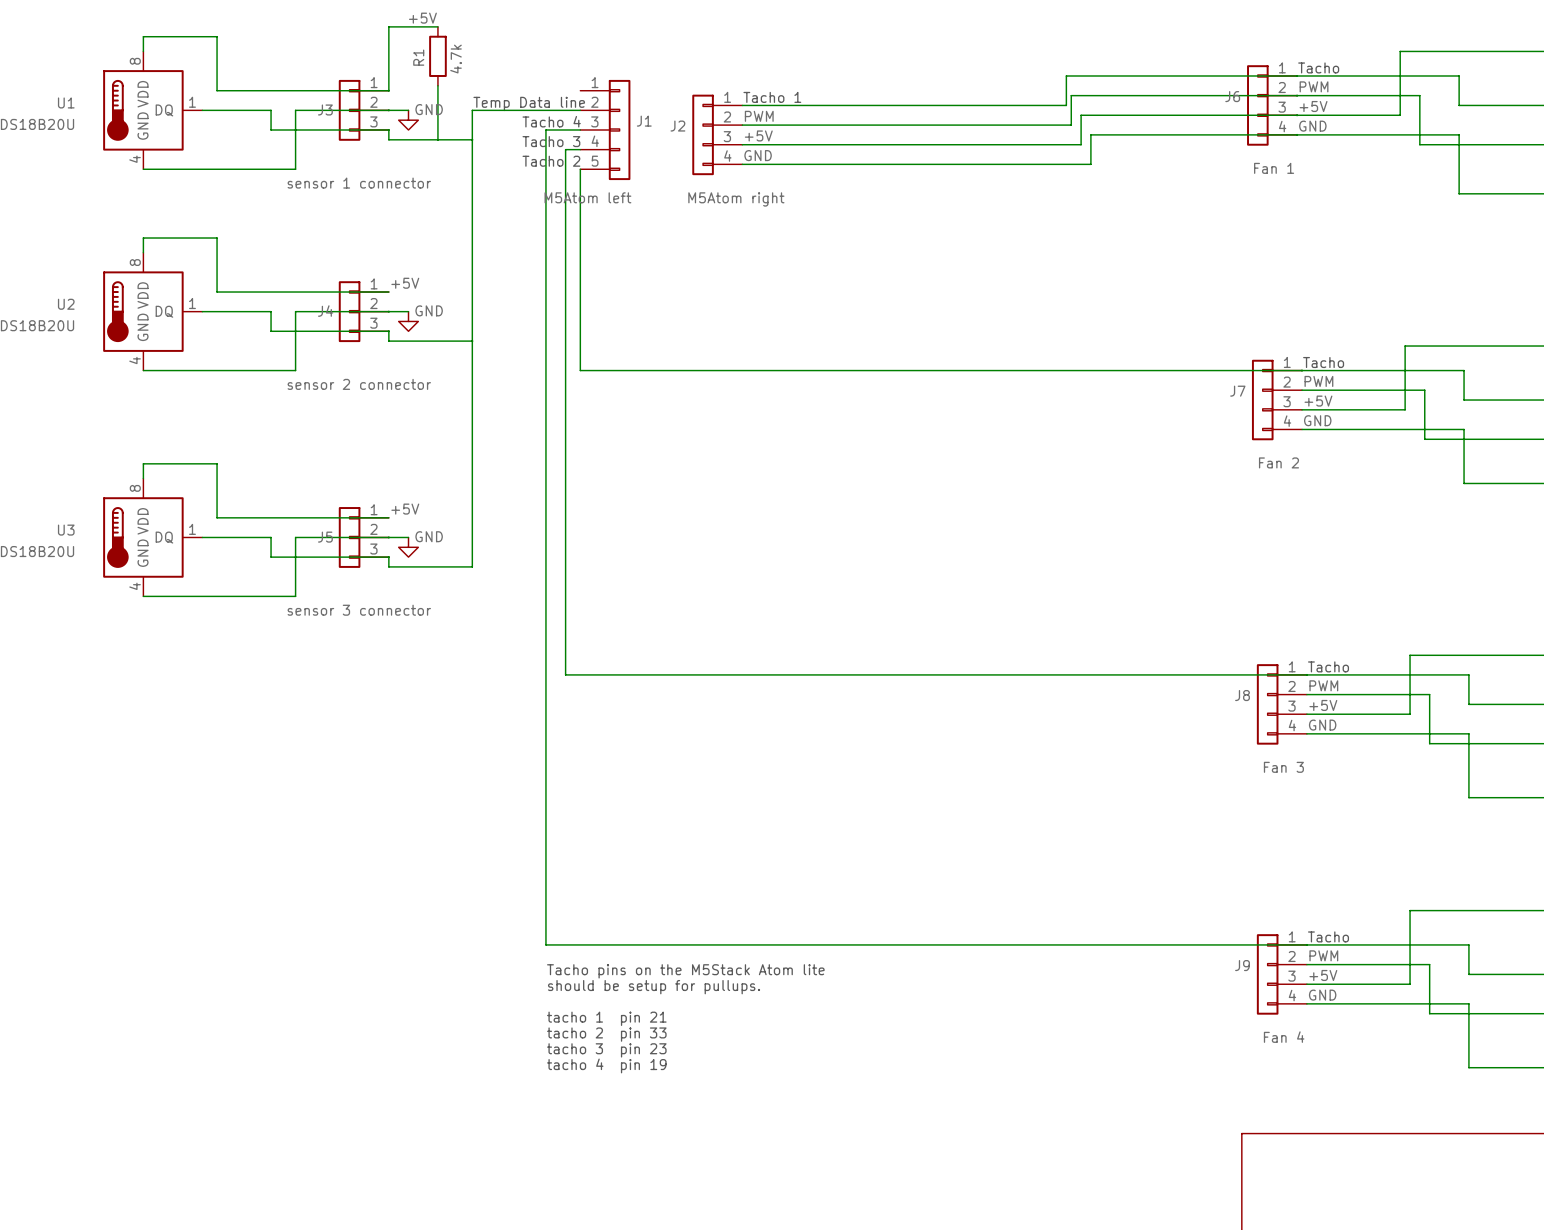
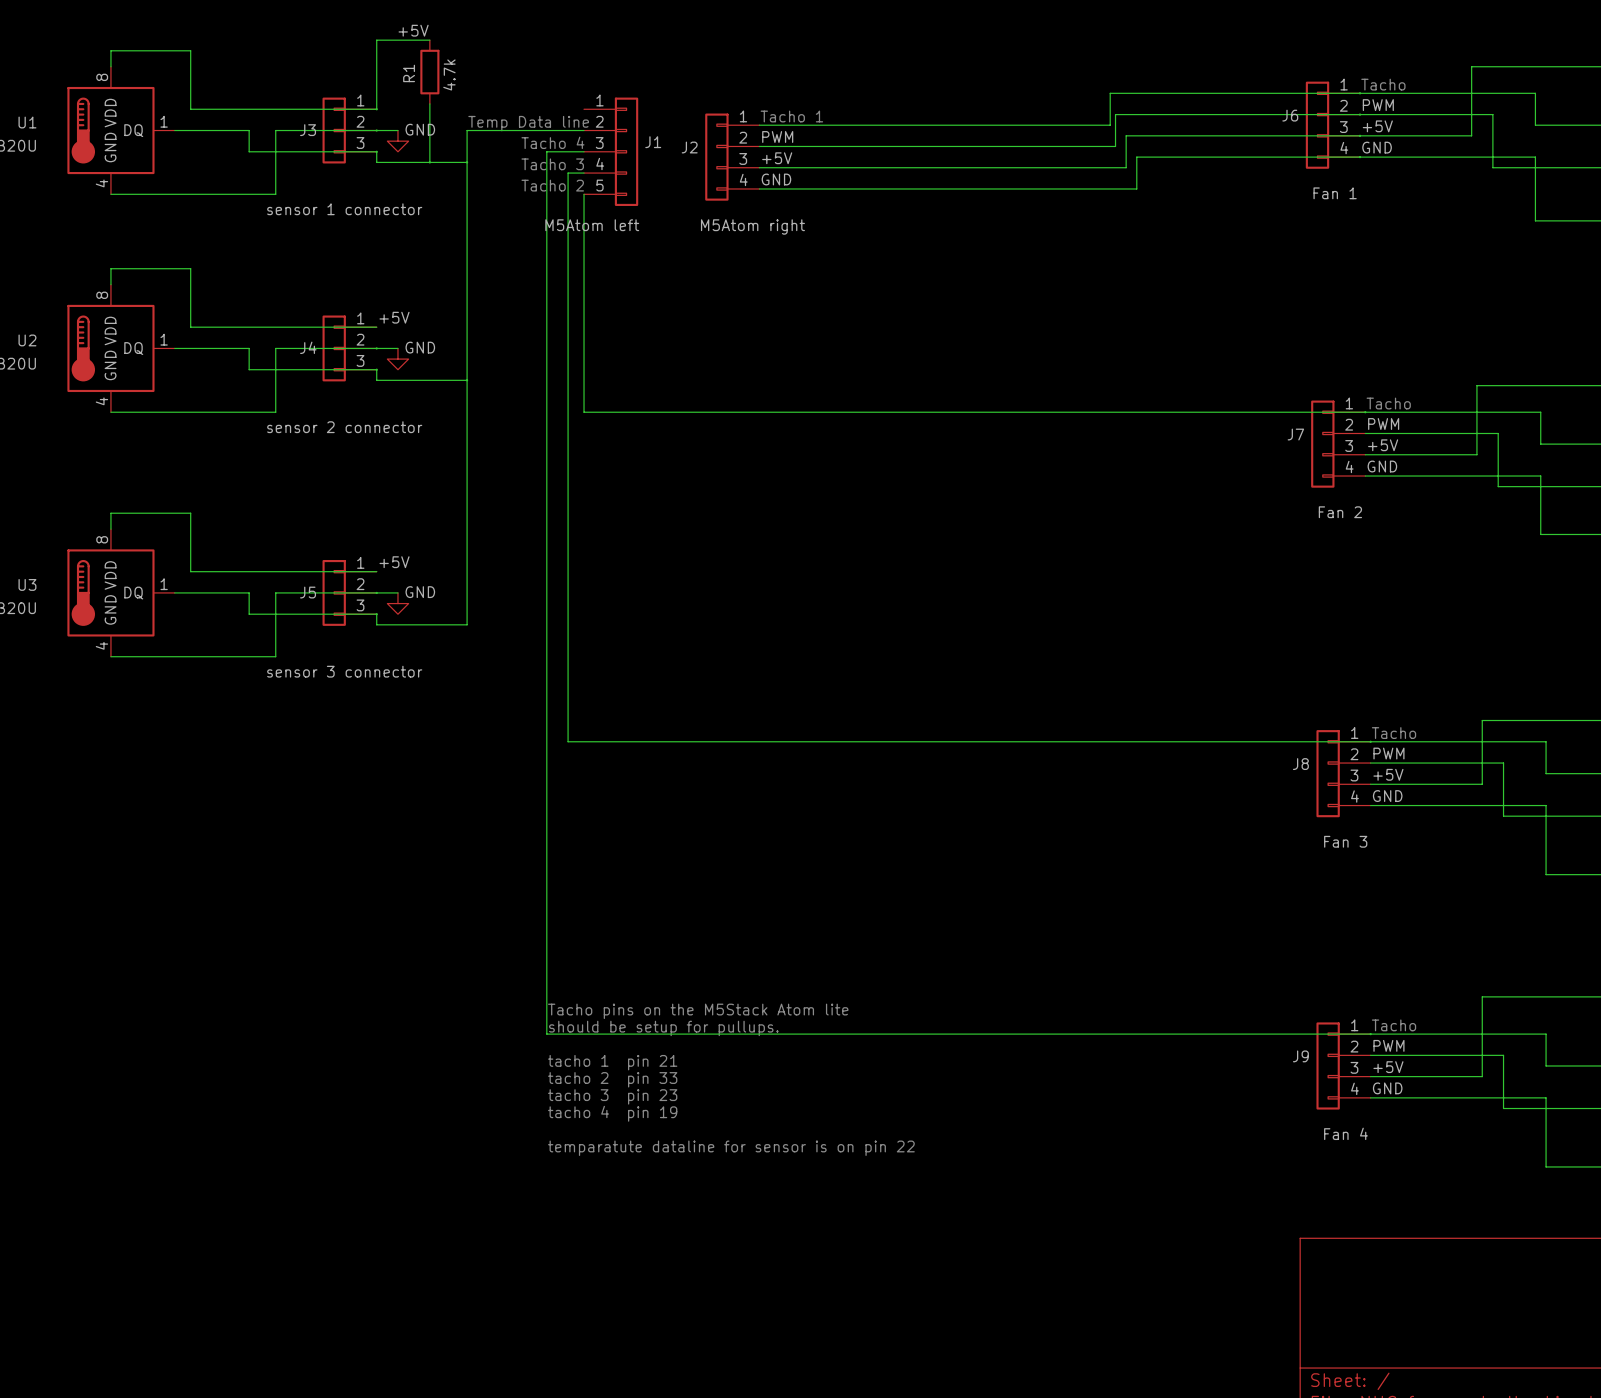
text: none -> Tacho pins on the M5Stack Atom lite (698, 1011)
text: none -> should be setup for pullups. (663, 1028)
text: Tacho pins on the M5Stack Atom lite (685, 971) -> tacho 1 pin 21 (612, 1062)
text: should be setup for pullups. (654, 987) -> tacho 2 pin 33 (612, 1079)
text: none -> tacho 3 pin 23 (612, 1096)
text: tacho 1 pin 21 (606, 1018) -> tacho 4 pin 19 (612, 1113)
text: tacho 2 pin 33 (606, 1034) -> none
text: tacho 3 pin 23 (606, 1050) -> temparatute dataline for sensor is on pin 22 (731, 1148)
text: tacho 4 pin 19 (606, 1065) -> none

